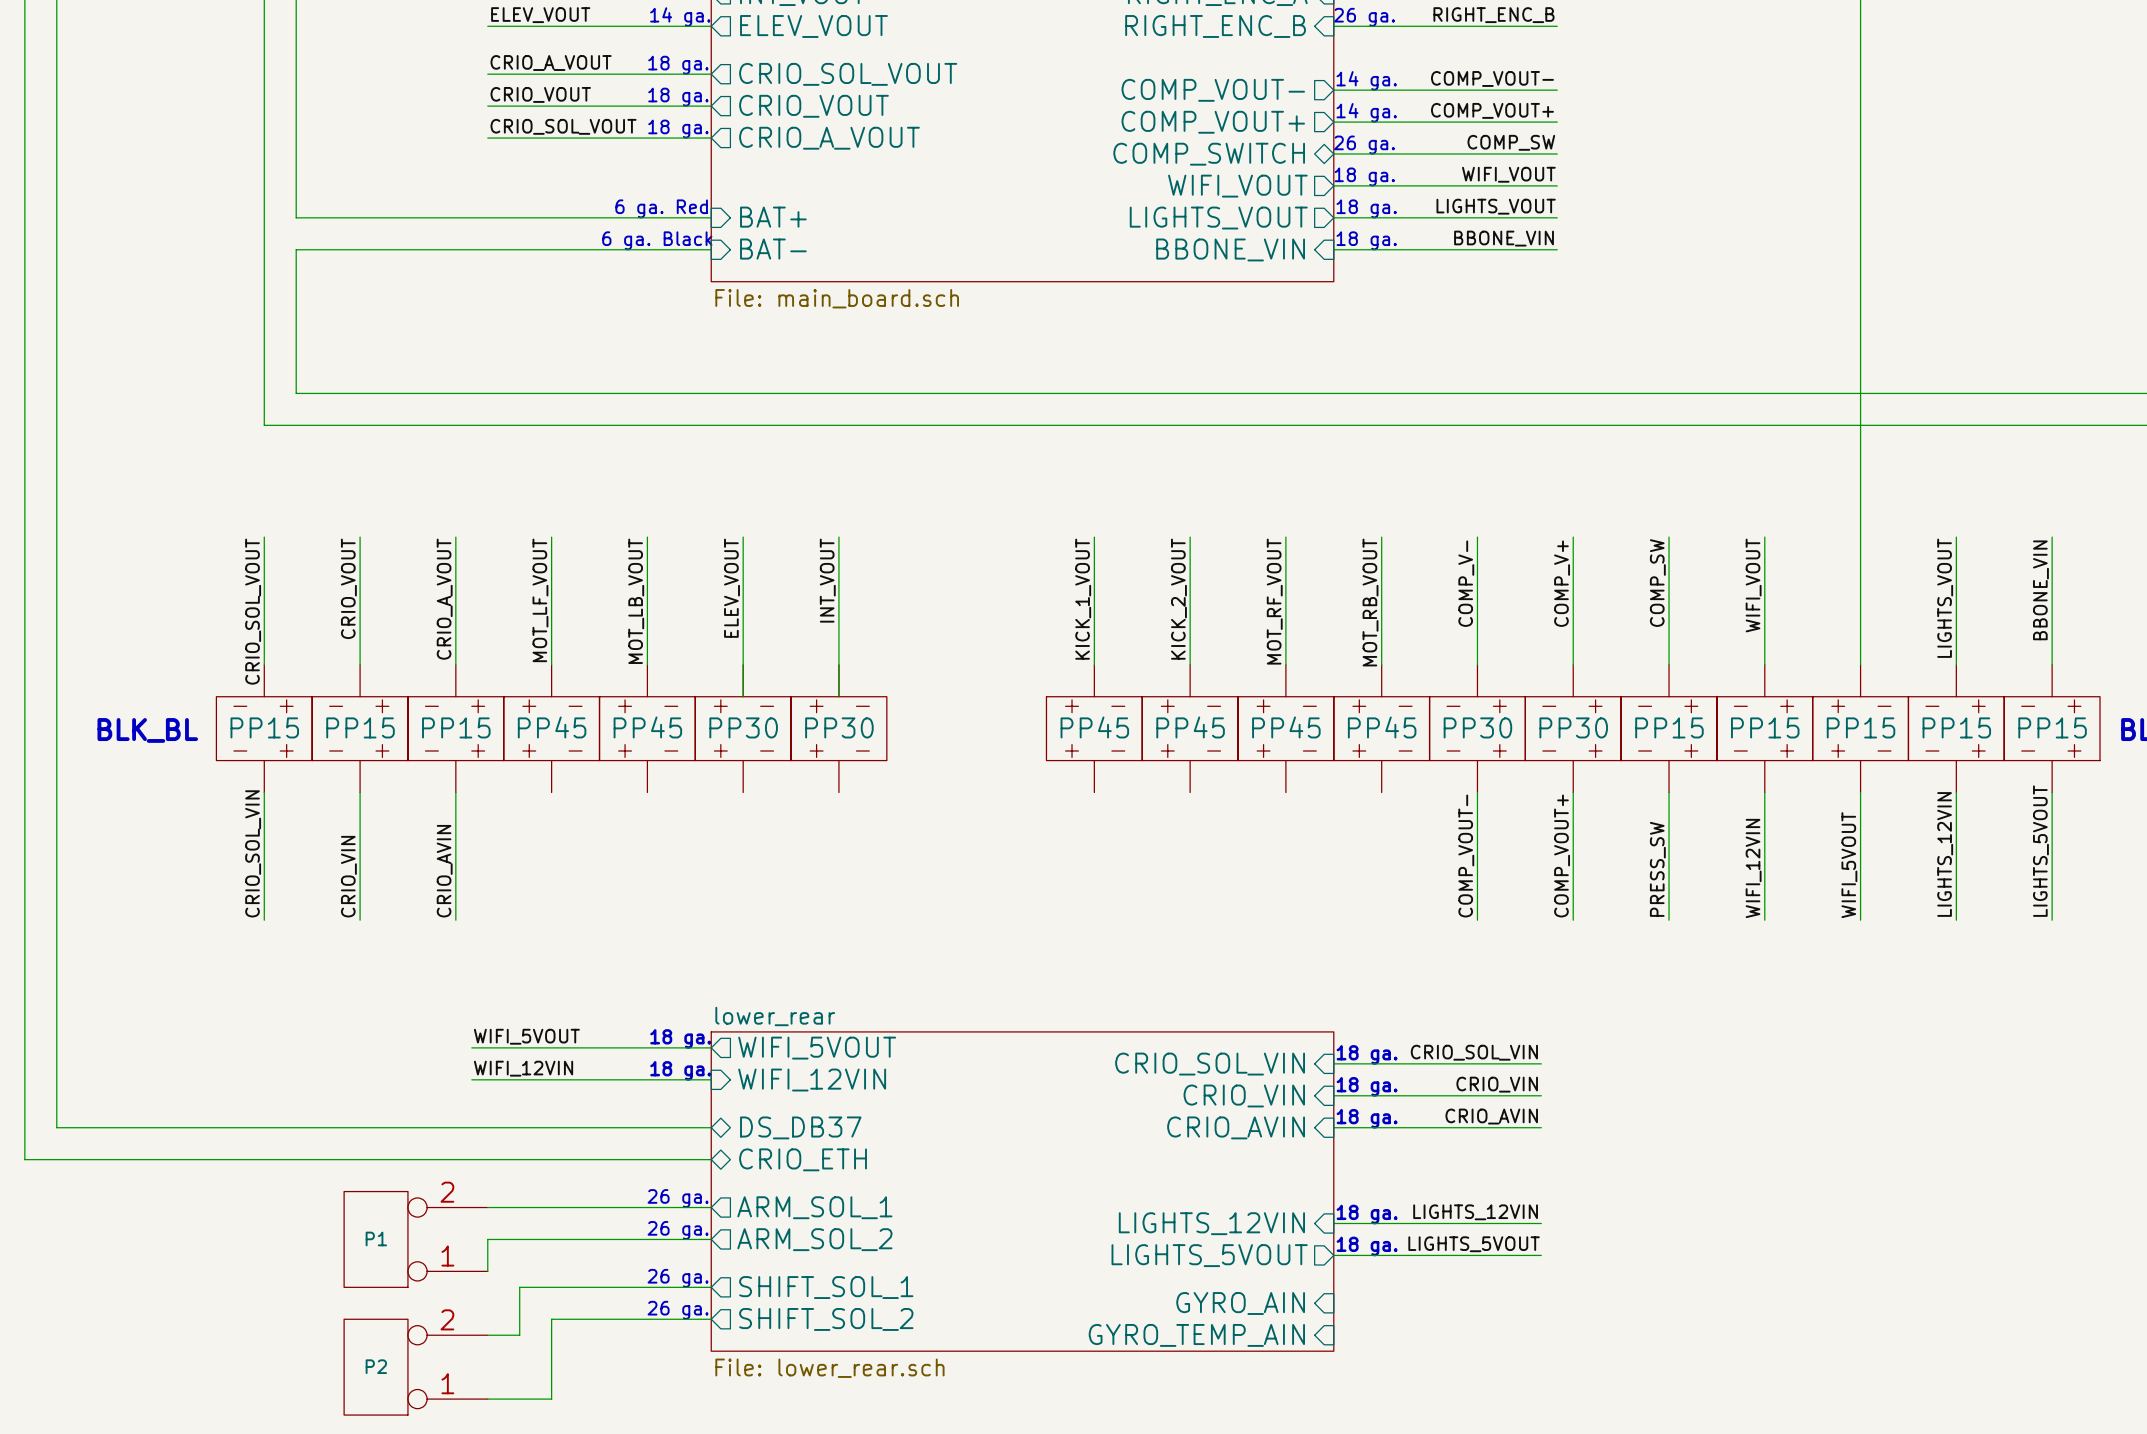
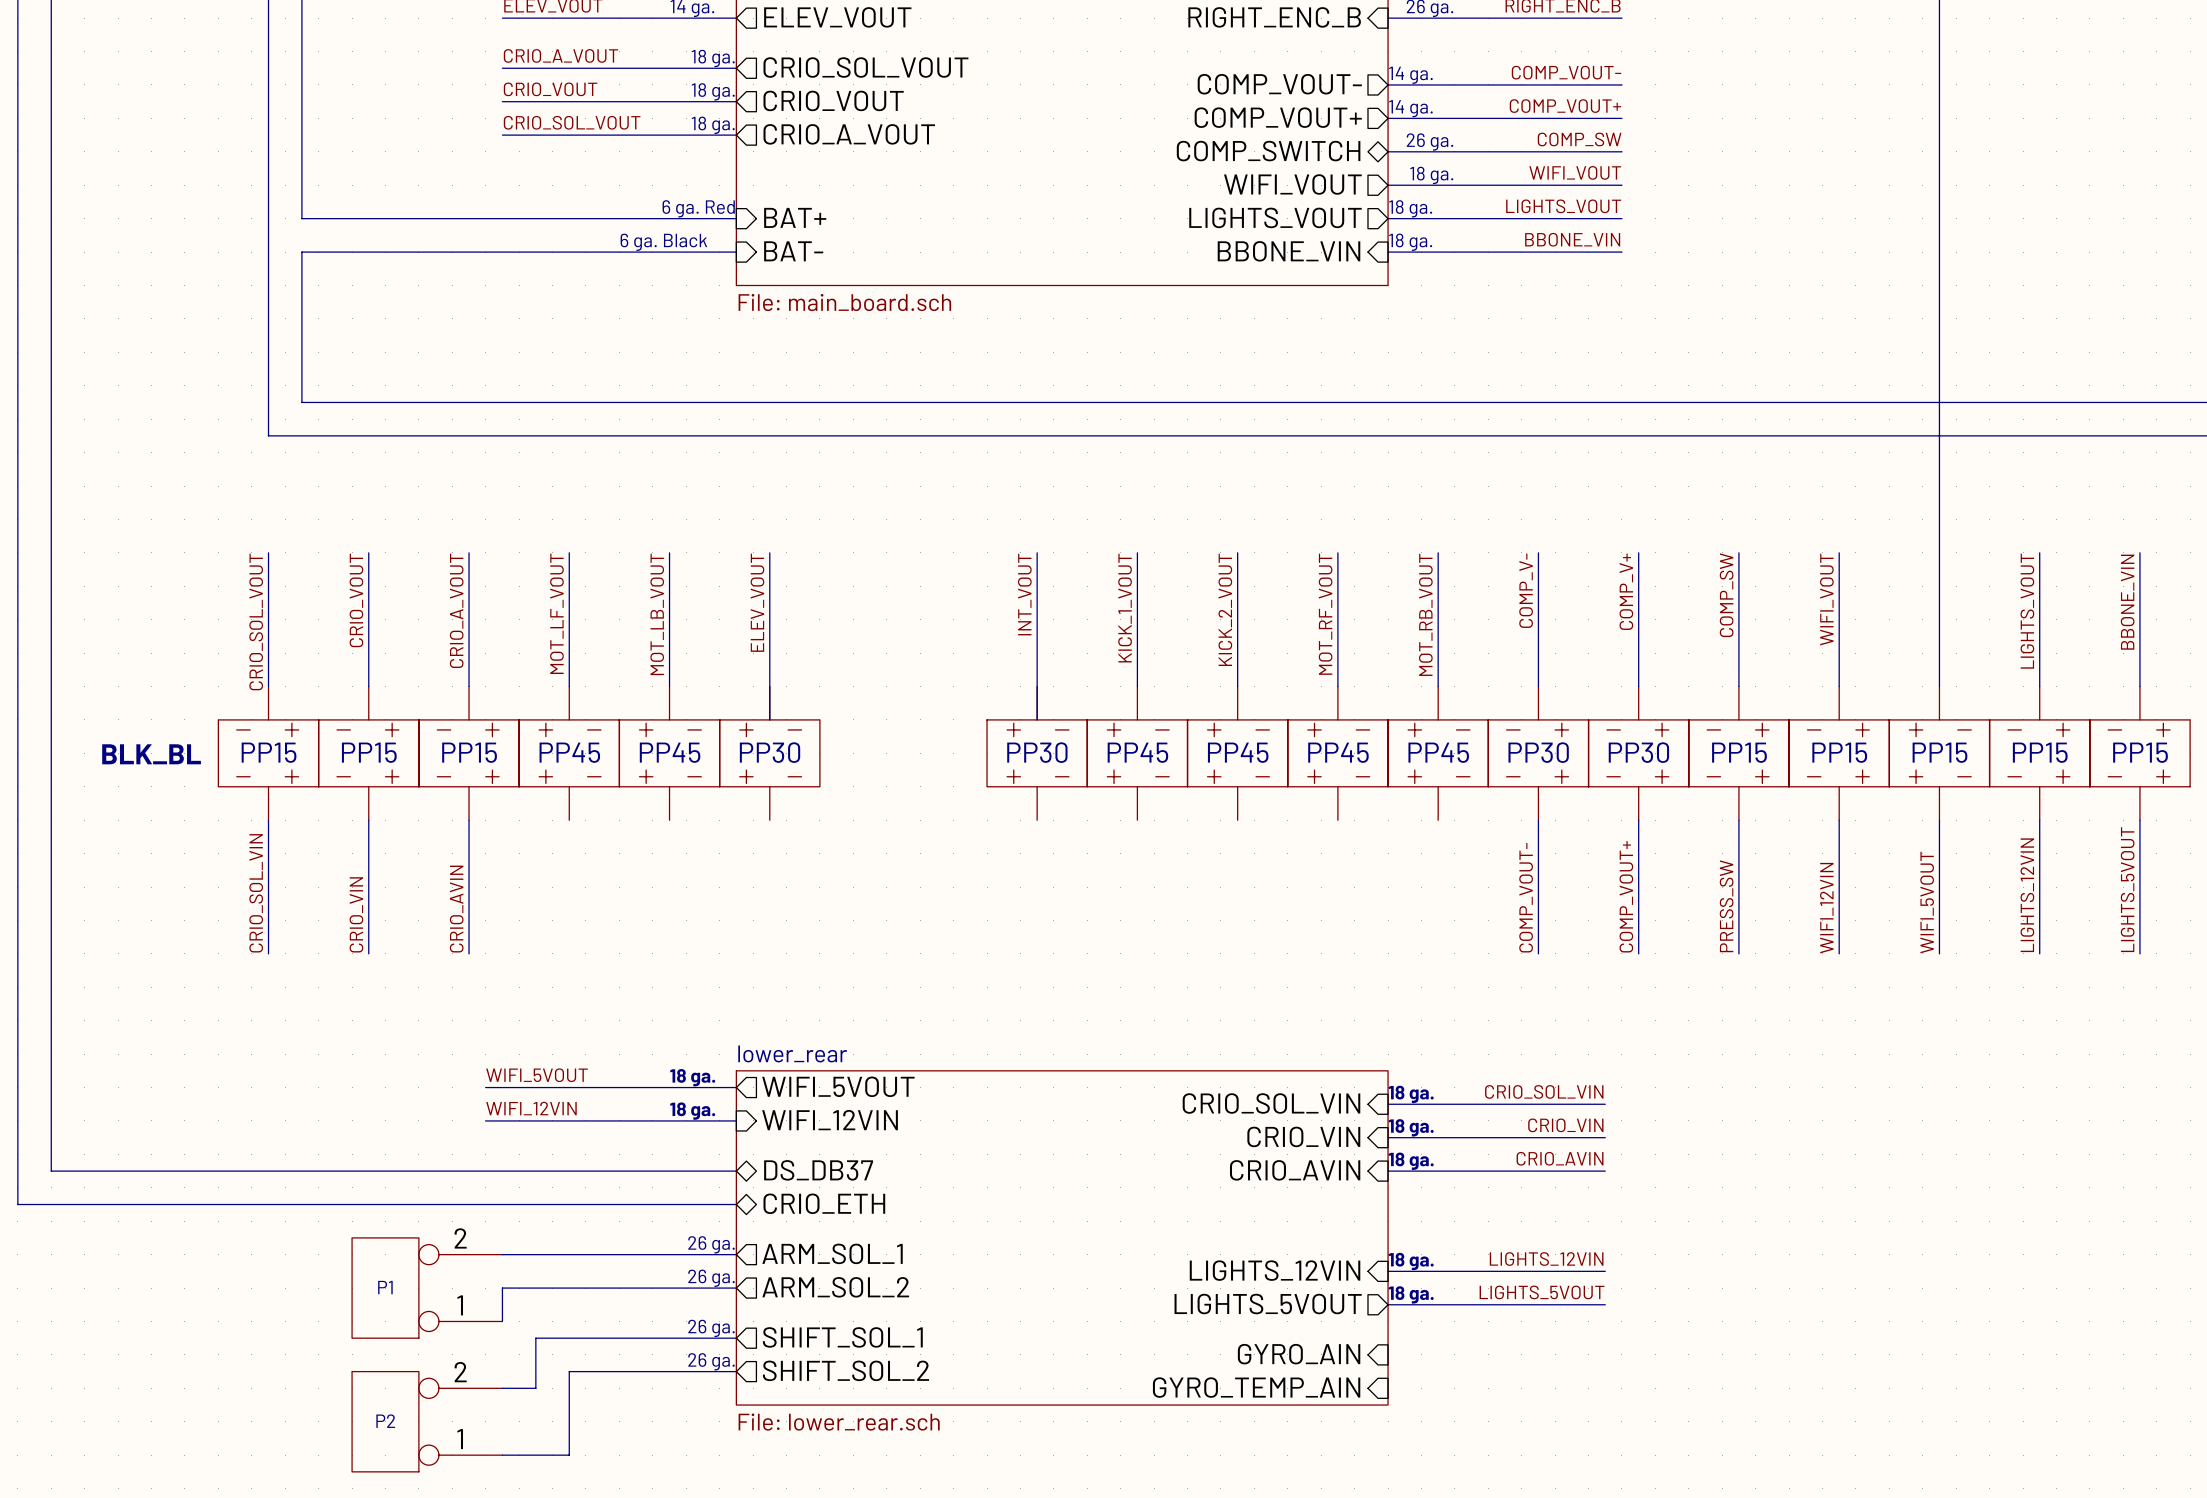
wire: (838, 537) (838, 696) -> (1037, 552) (1037, 719)
label position: INT_VOUT (827, 580) -> INT_VOUT (1024, 594)
part position: (838, 728) -> (1037, 753)

